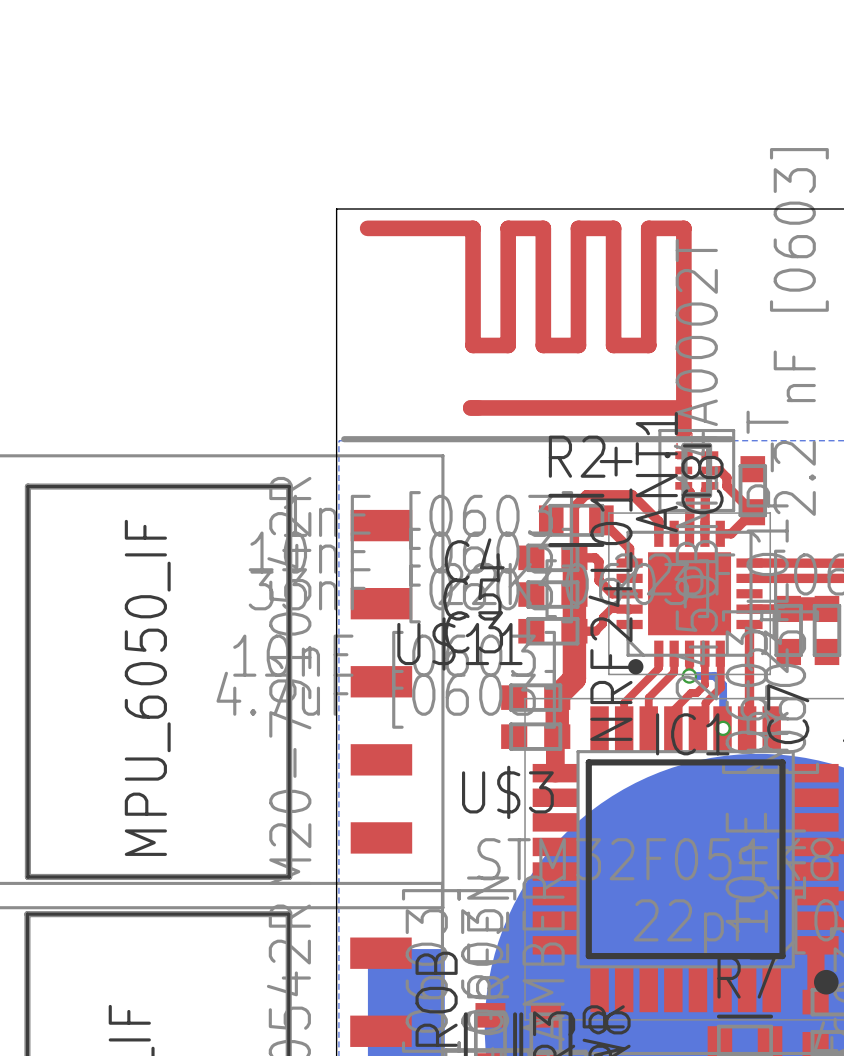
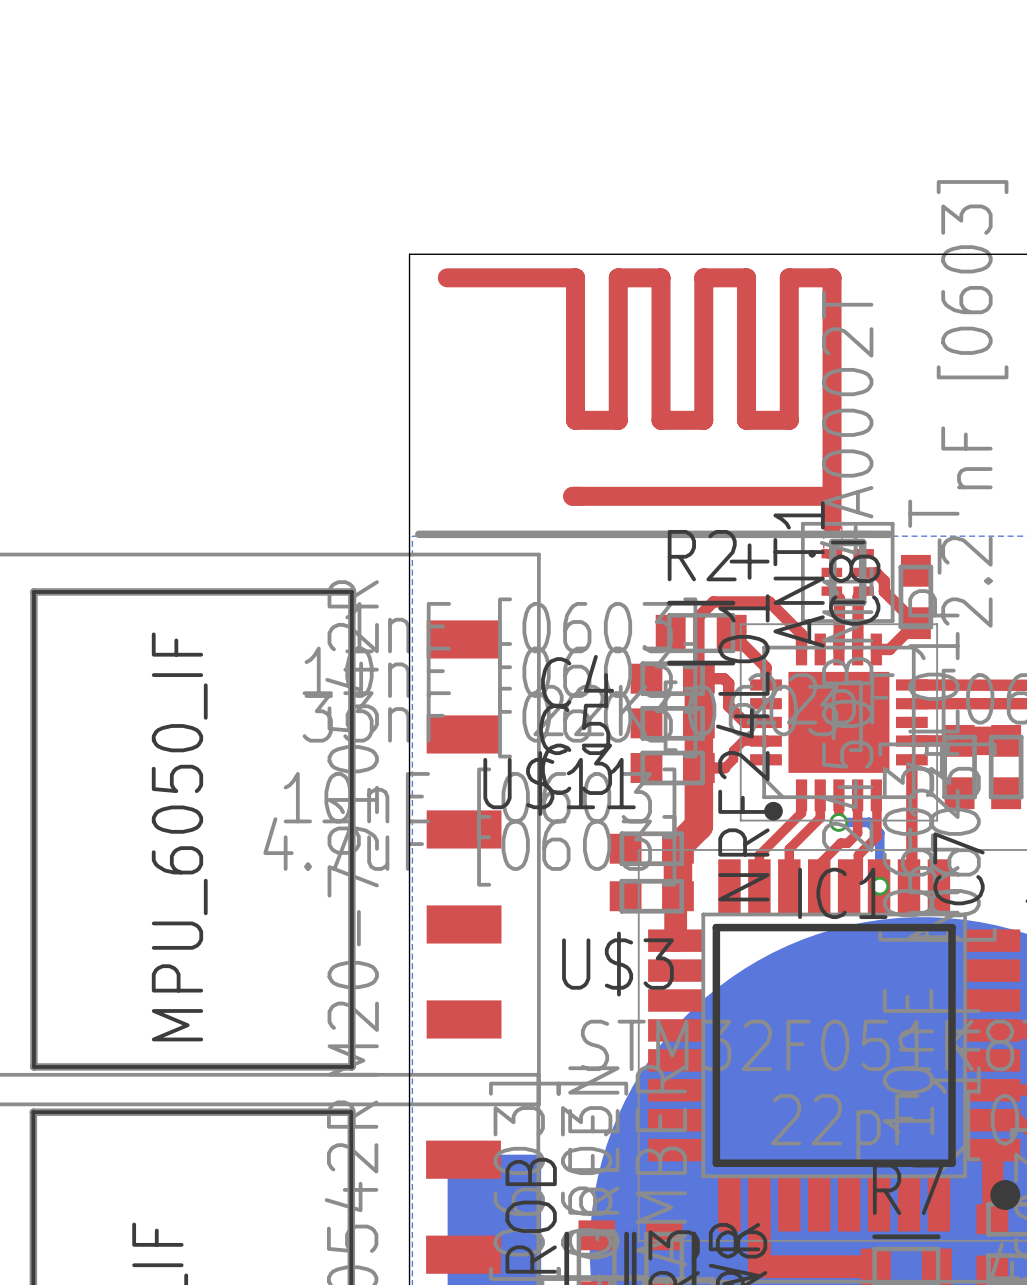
top track: none -> (759, 1203) (759, 1266) (870, 1266) (870, 1269)

